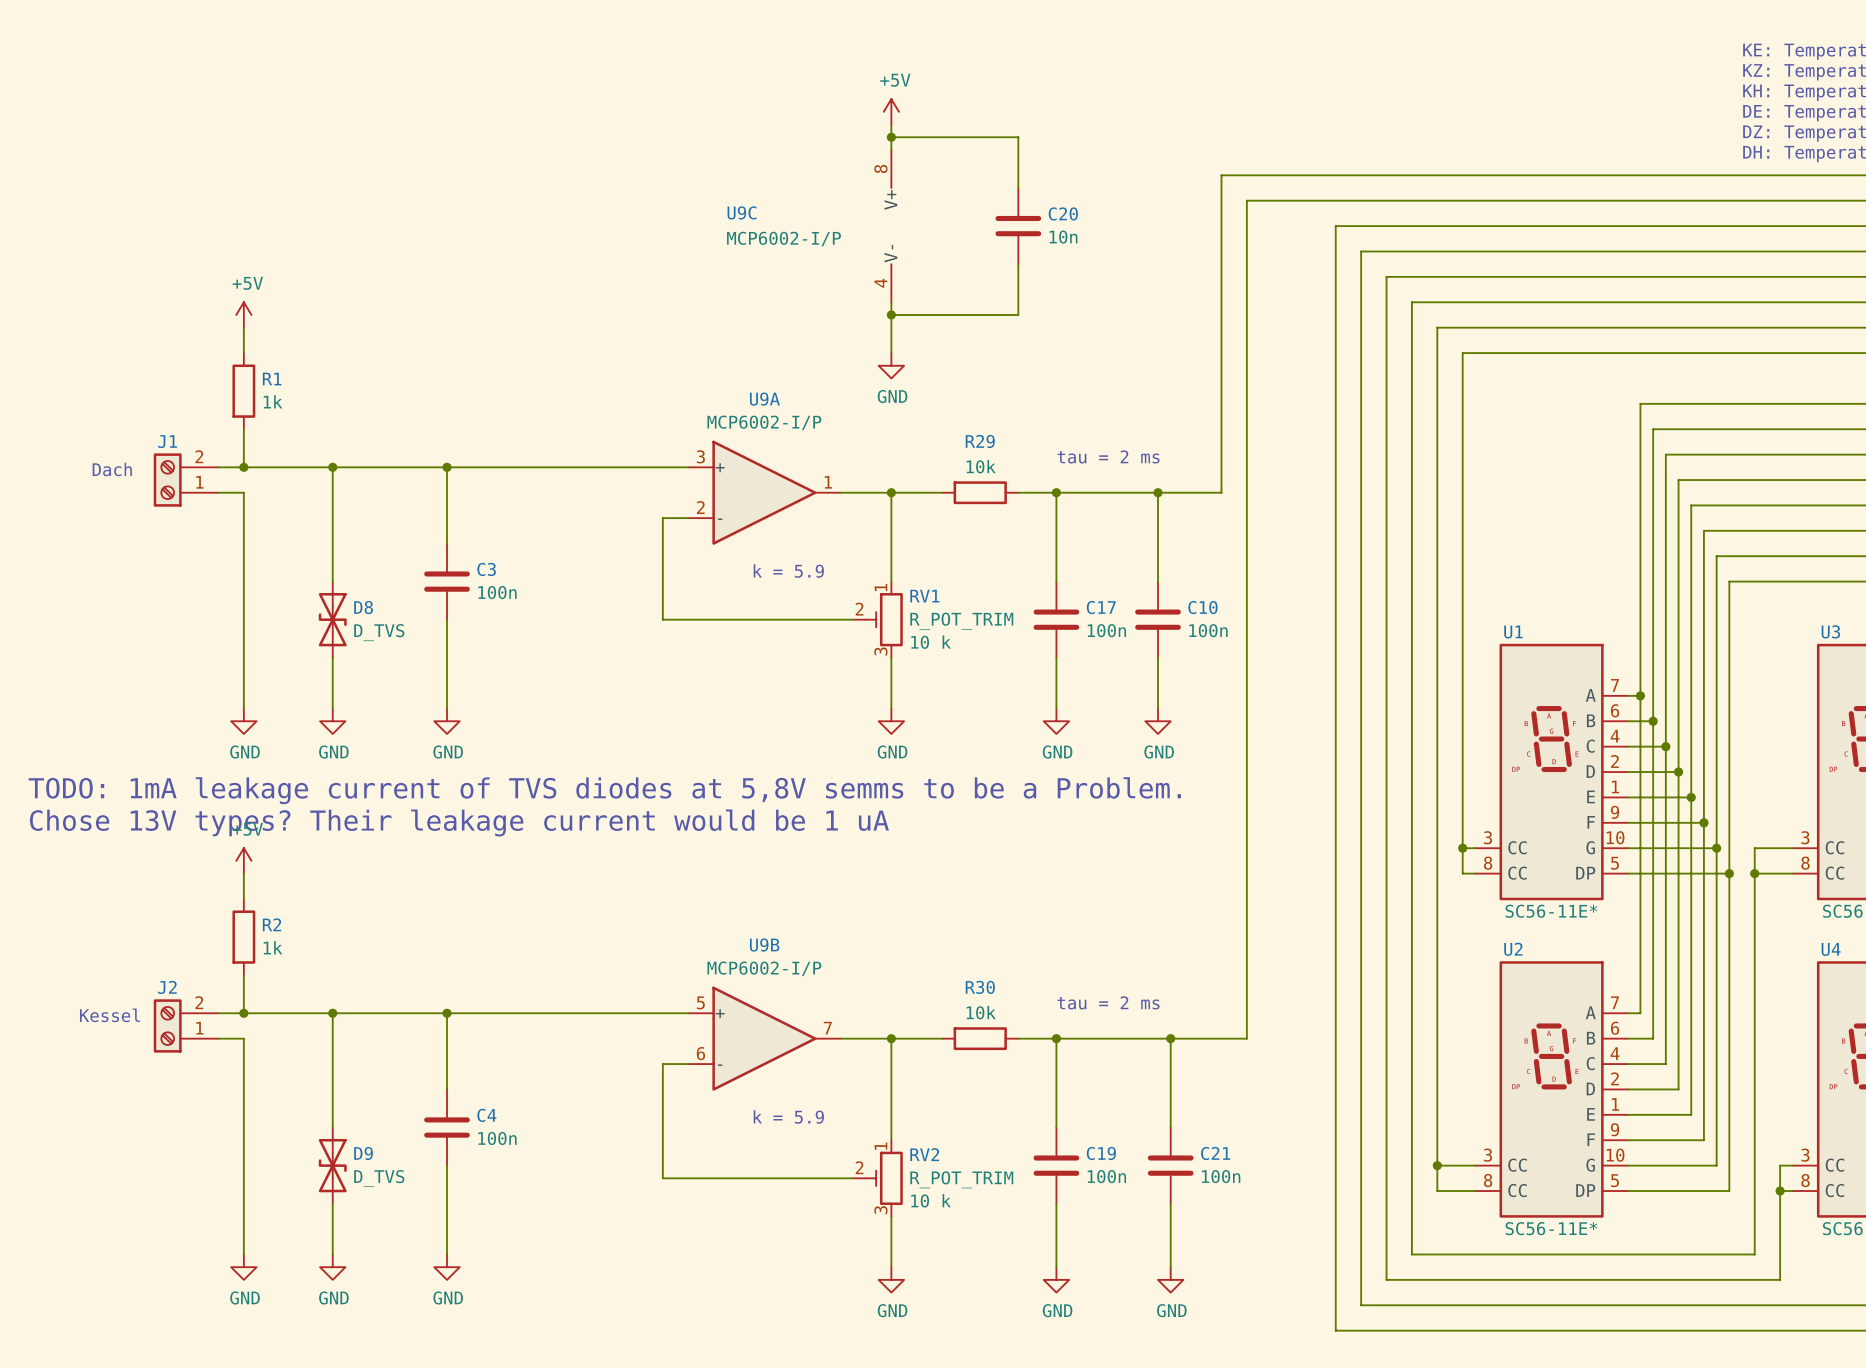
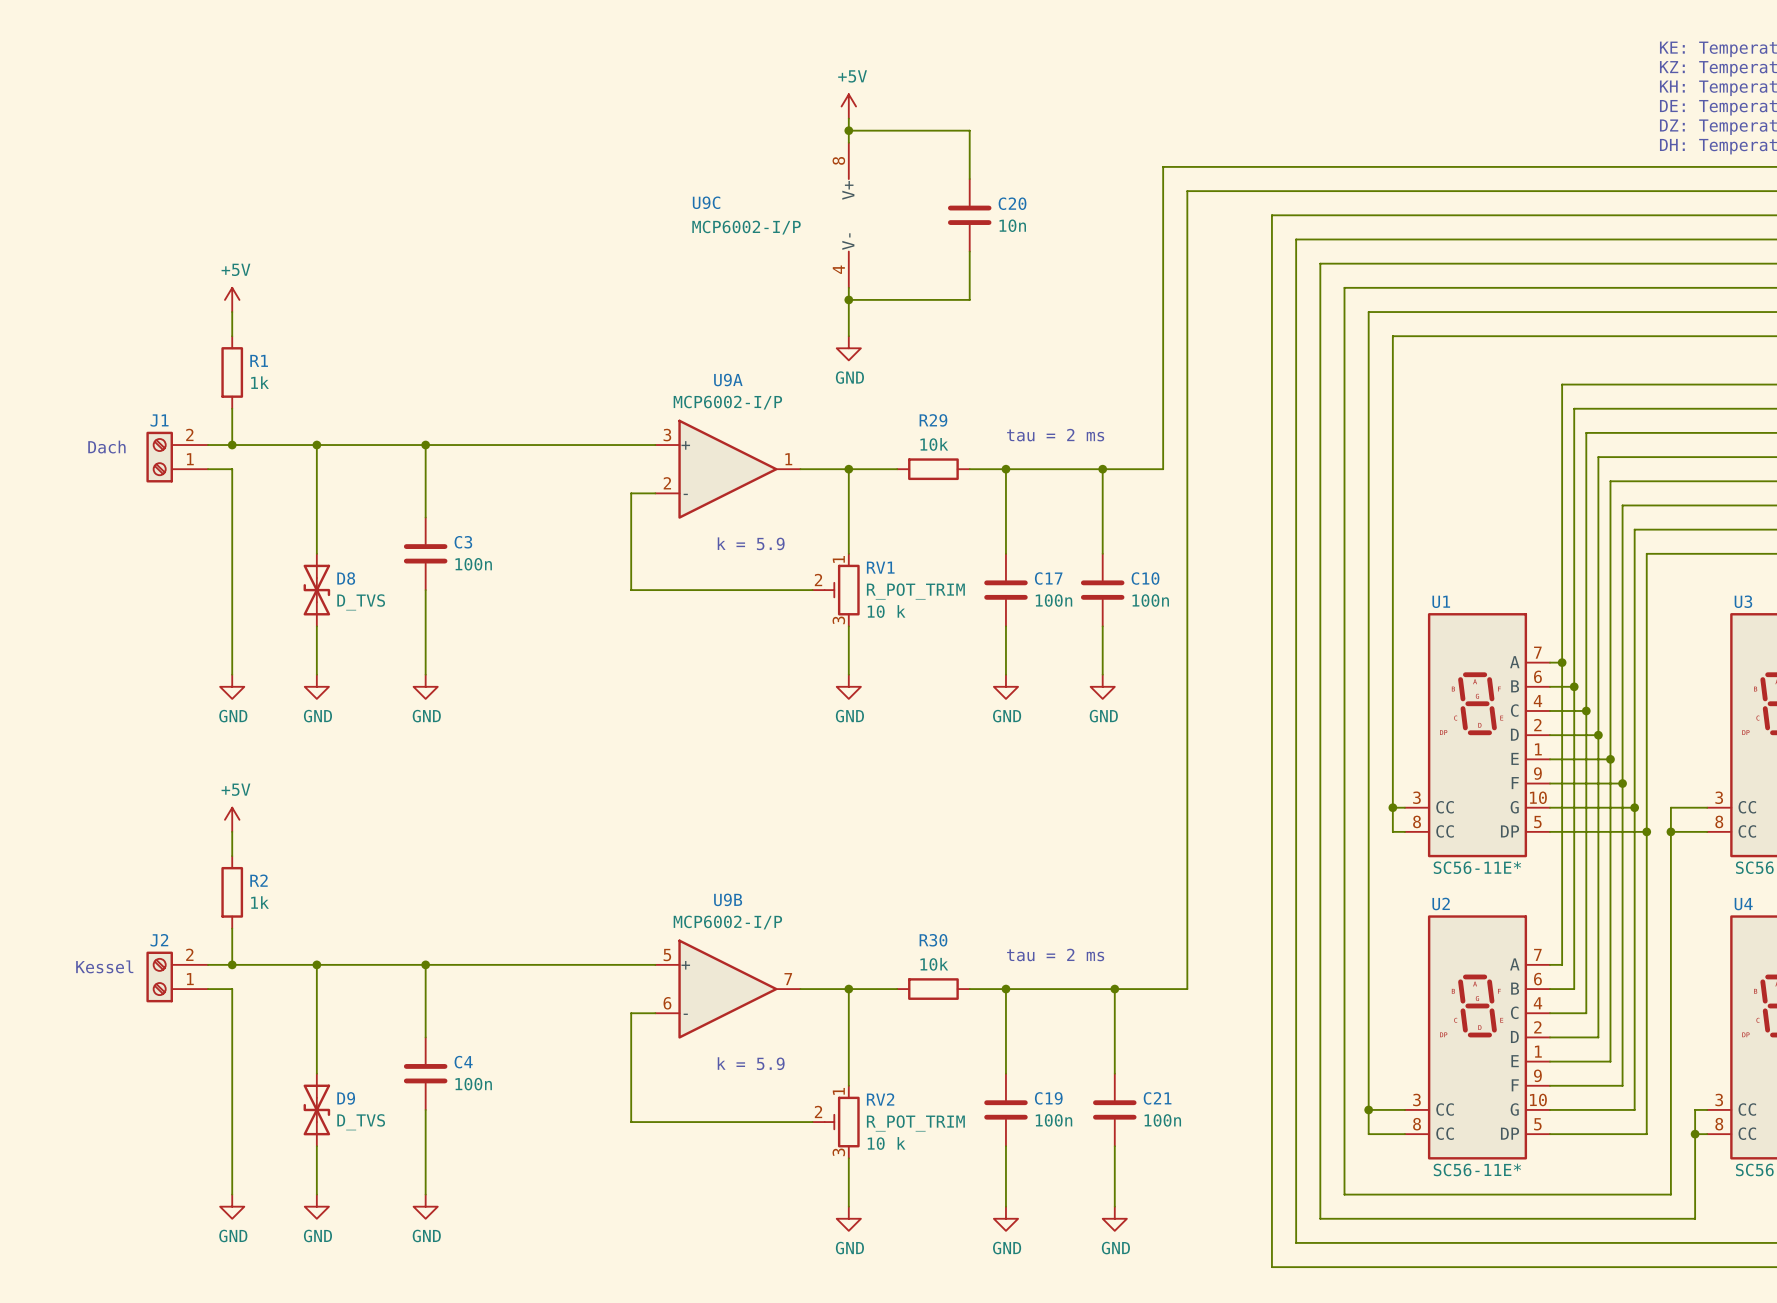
text: TODO: 1mA leakage current of TVS diodes at 5,8V semms to be a Problem. (604, 790) -> none
text: Chose 13V types? Their leakage current would be 1 uA (459, 822) -> none

